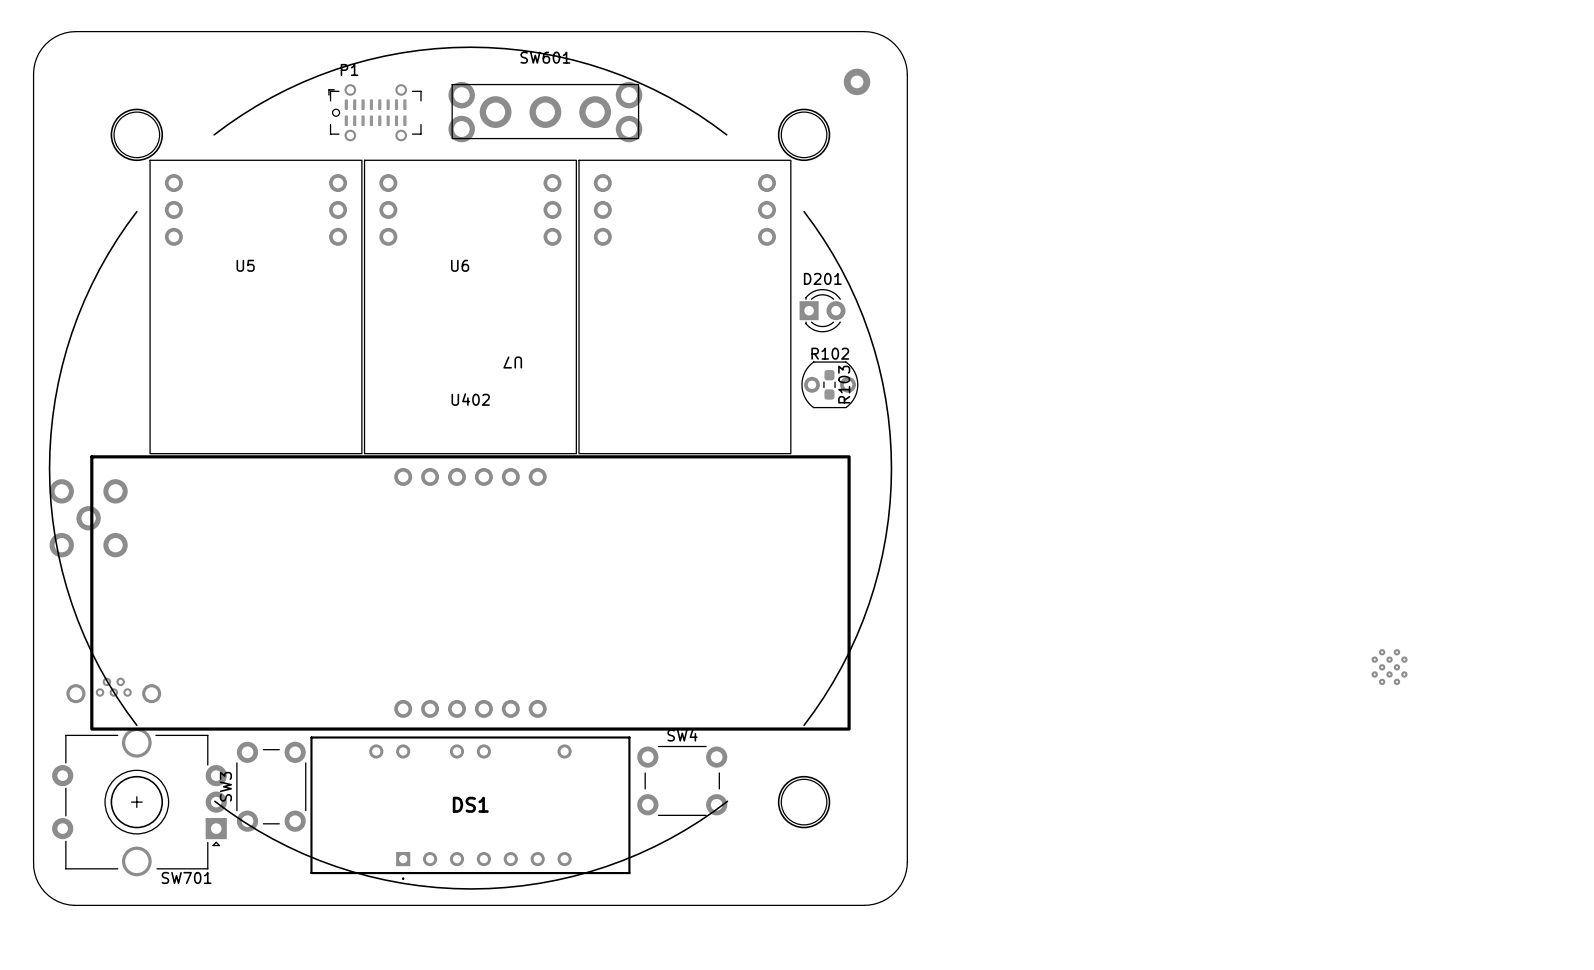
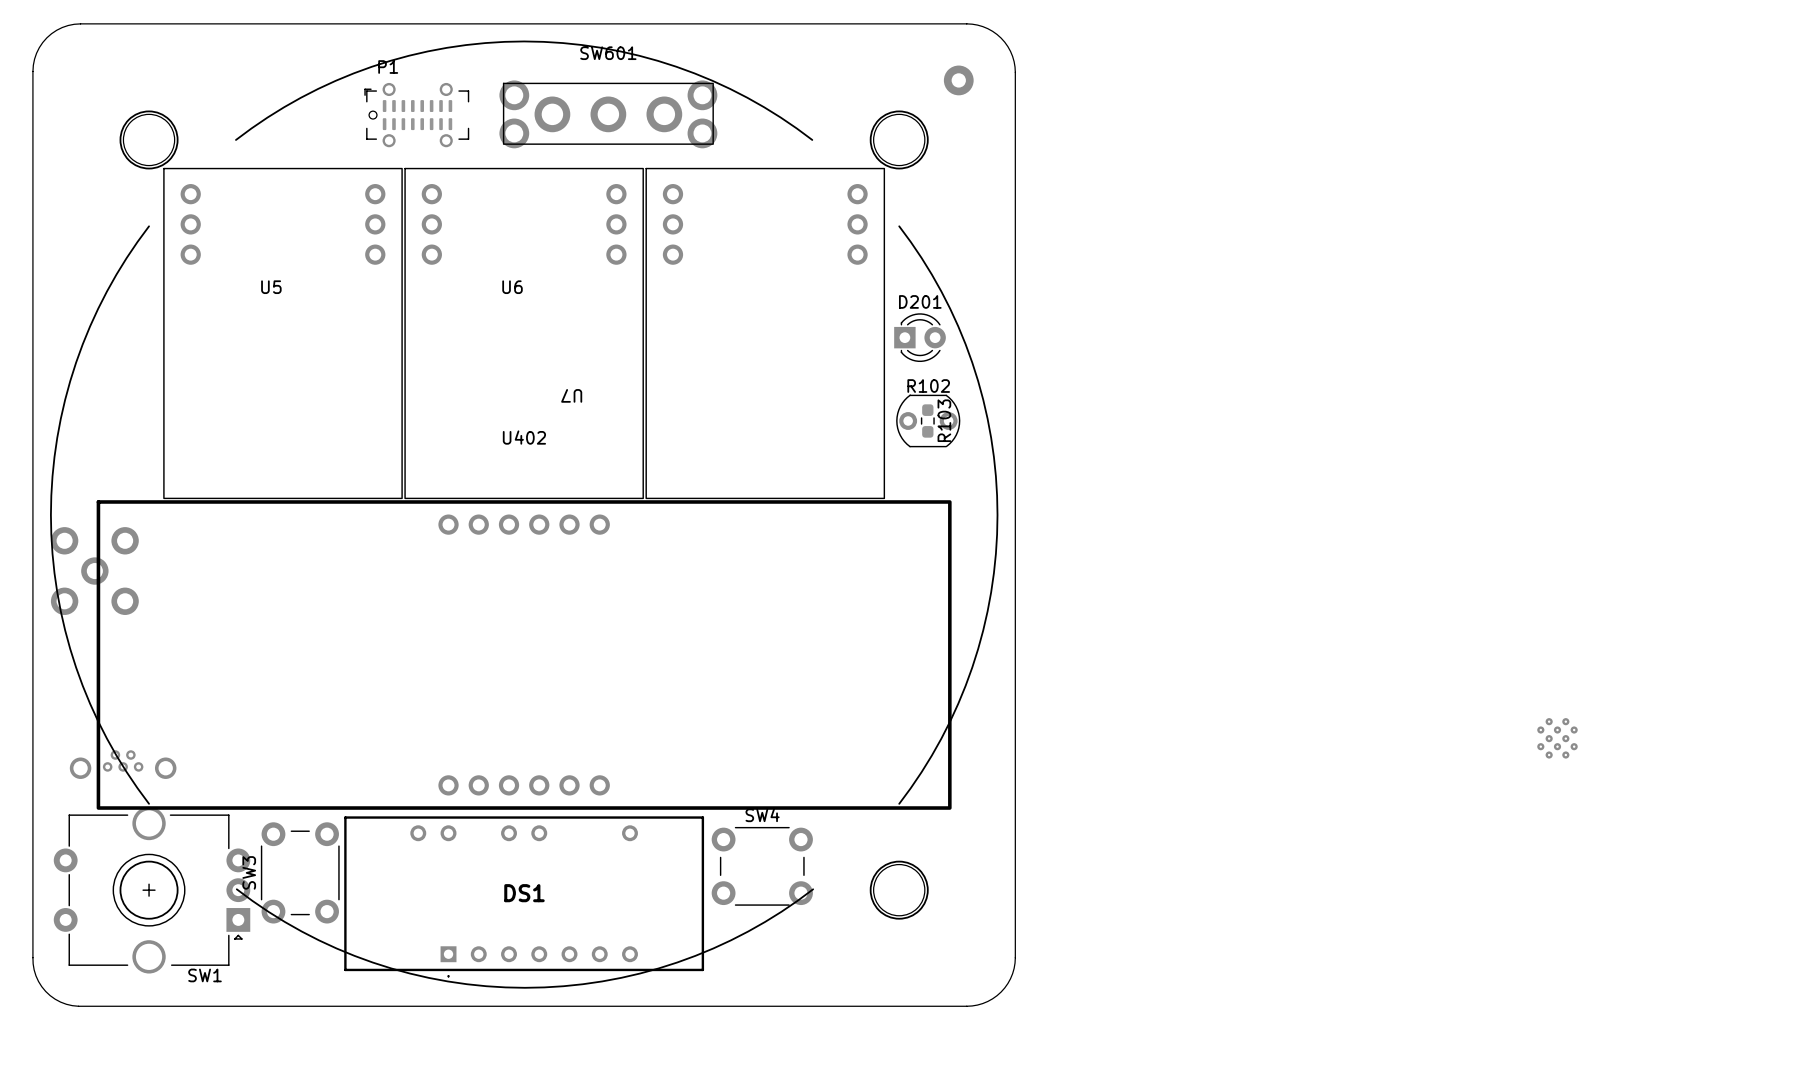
SW701 name: SW701 (186, 877) -> SW1 (205, 975)

